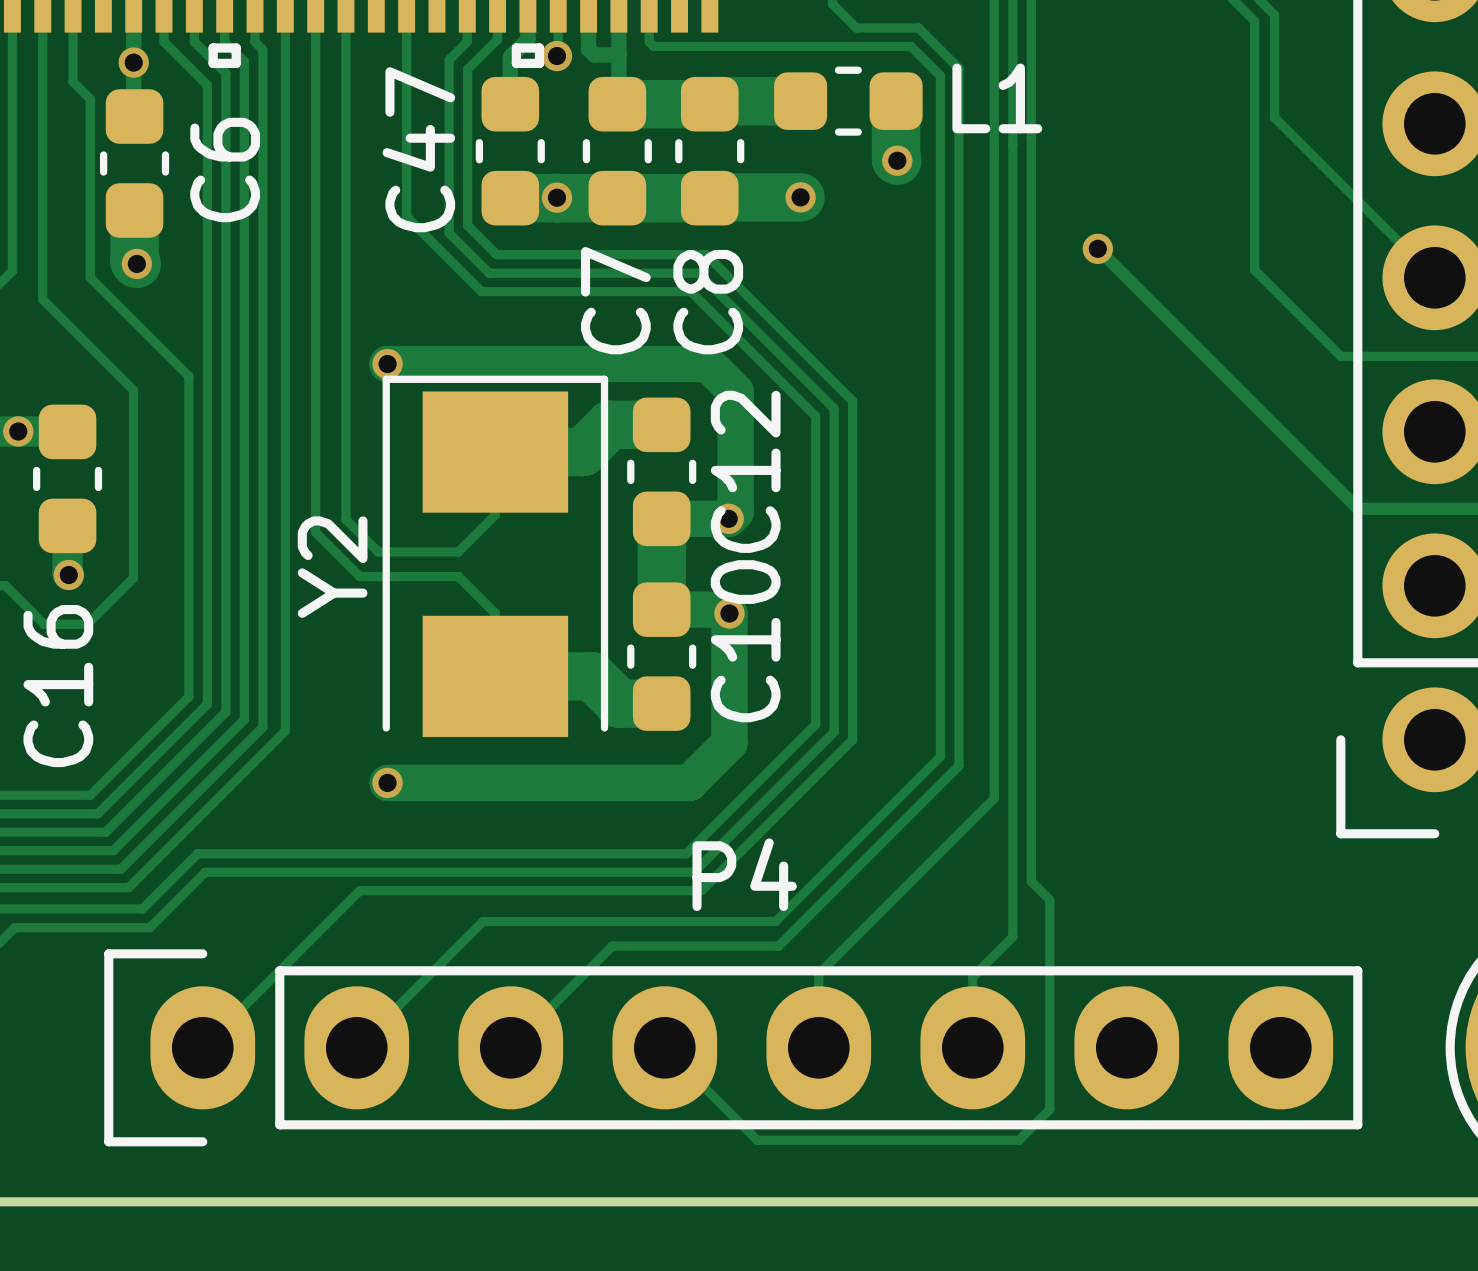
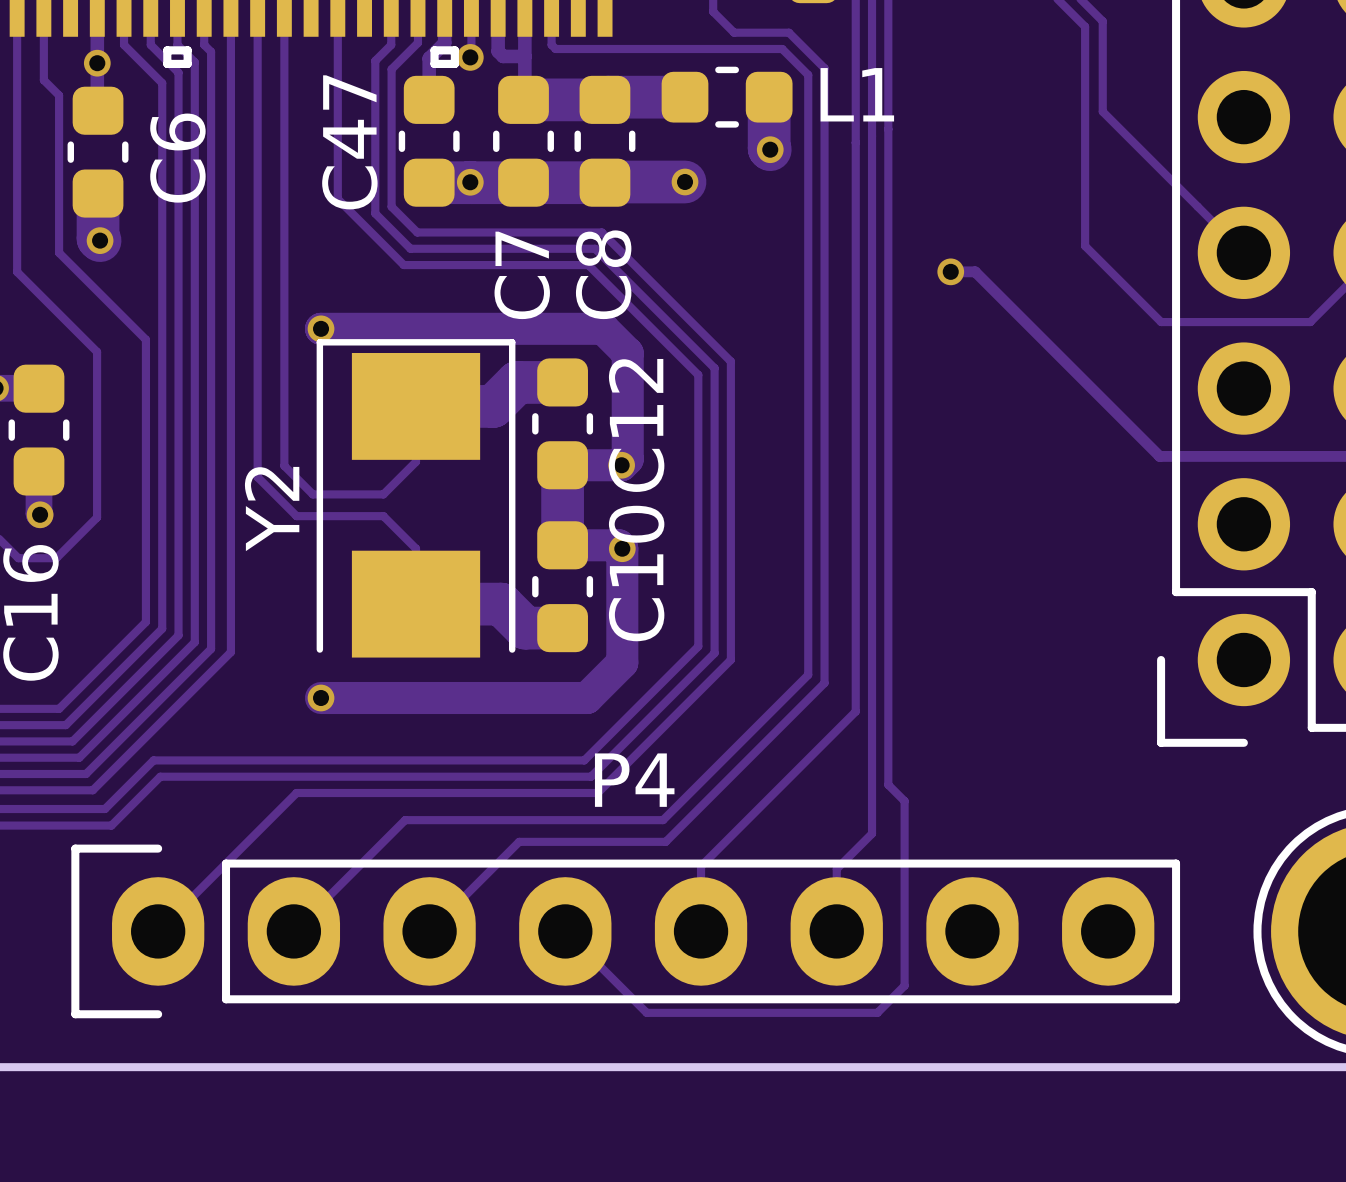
track: (1097, 248) (1357, 508) -> (950, 271) (975, 271) (1159, 456) (1176, 456)
via position: (1097, 248) -> (950, 271)

